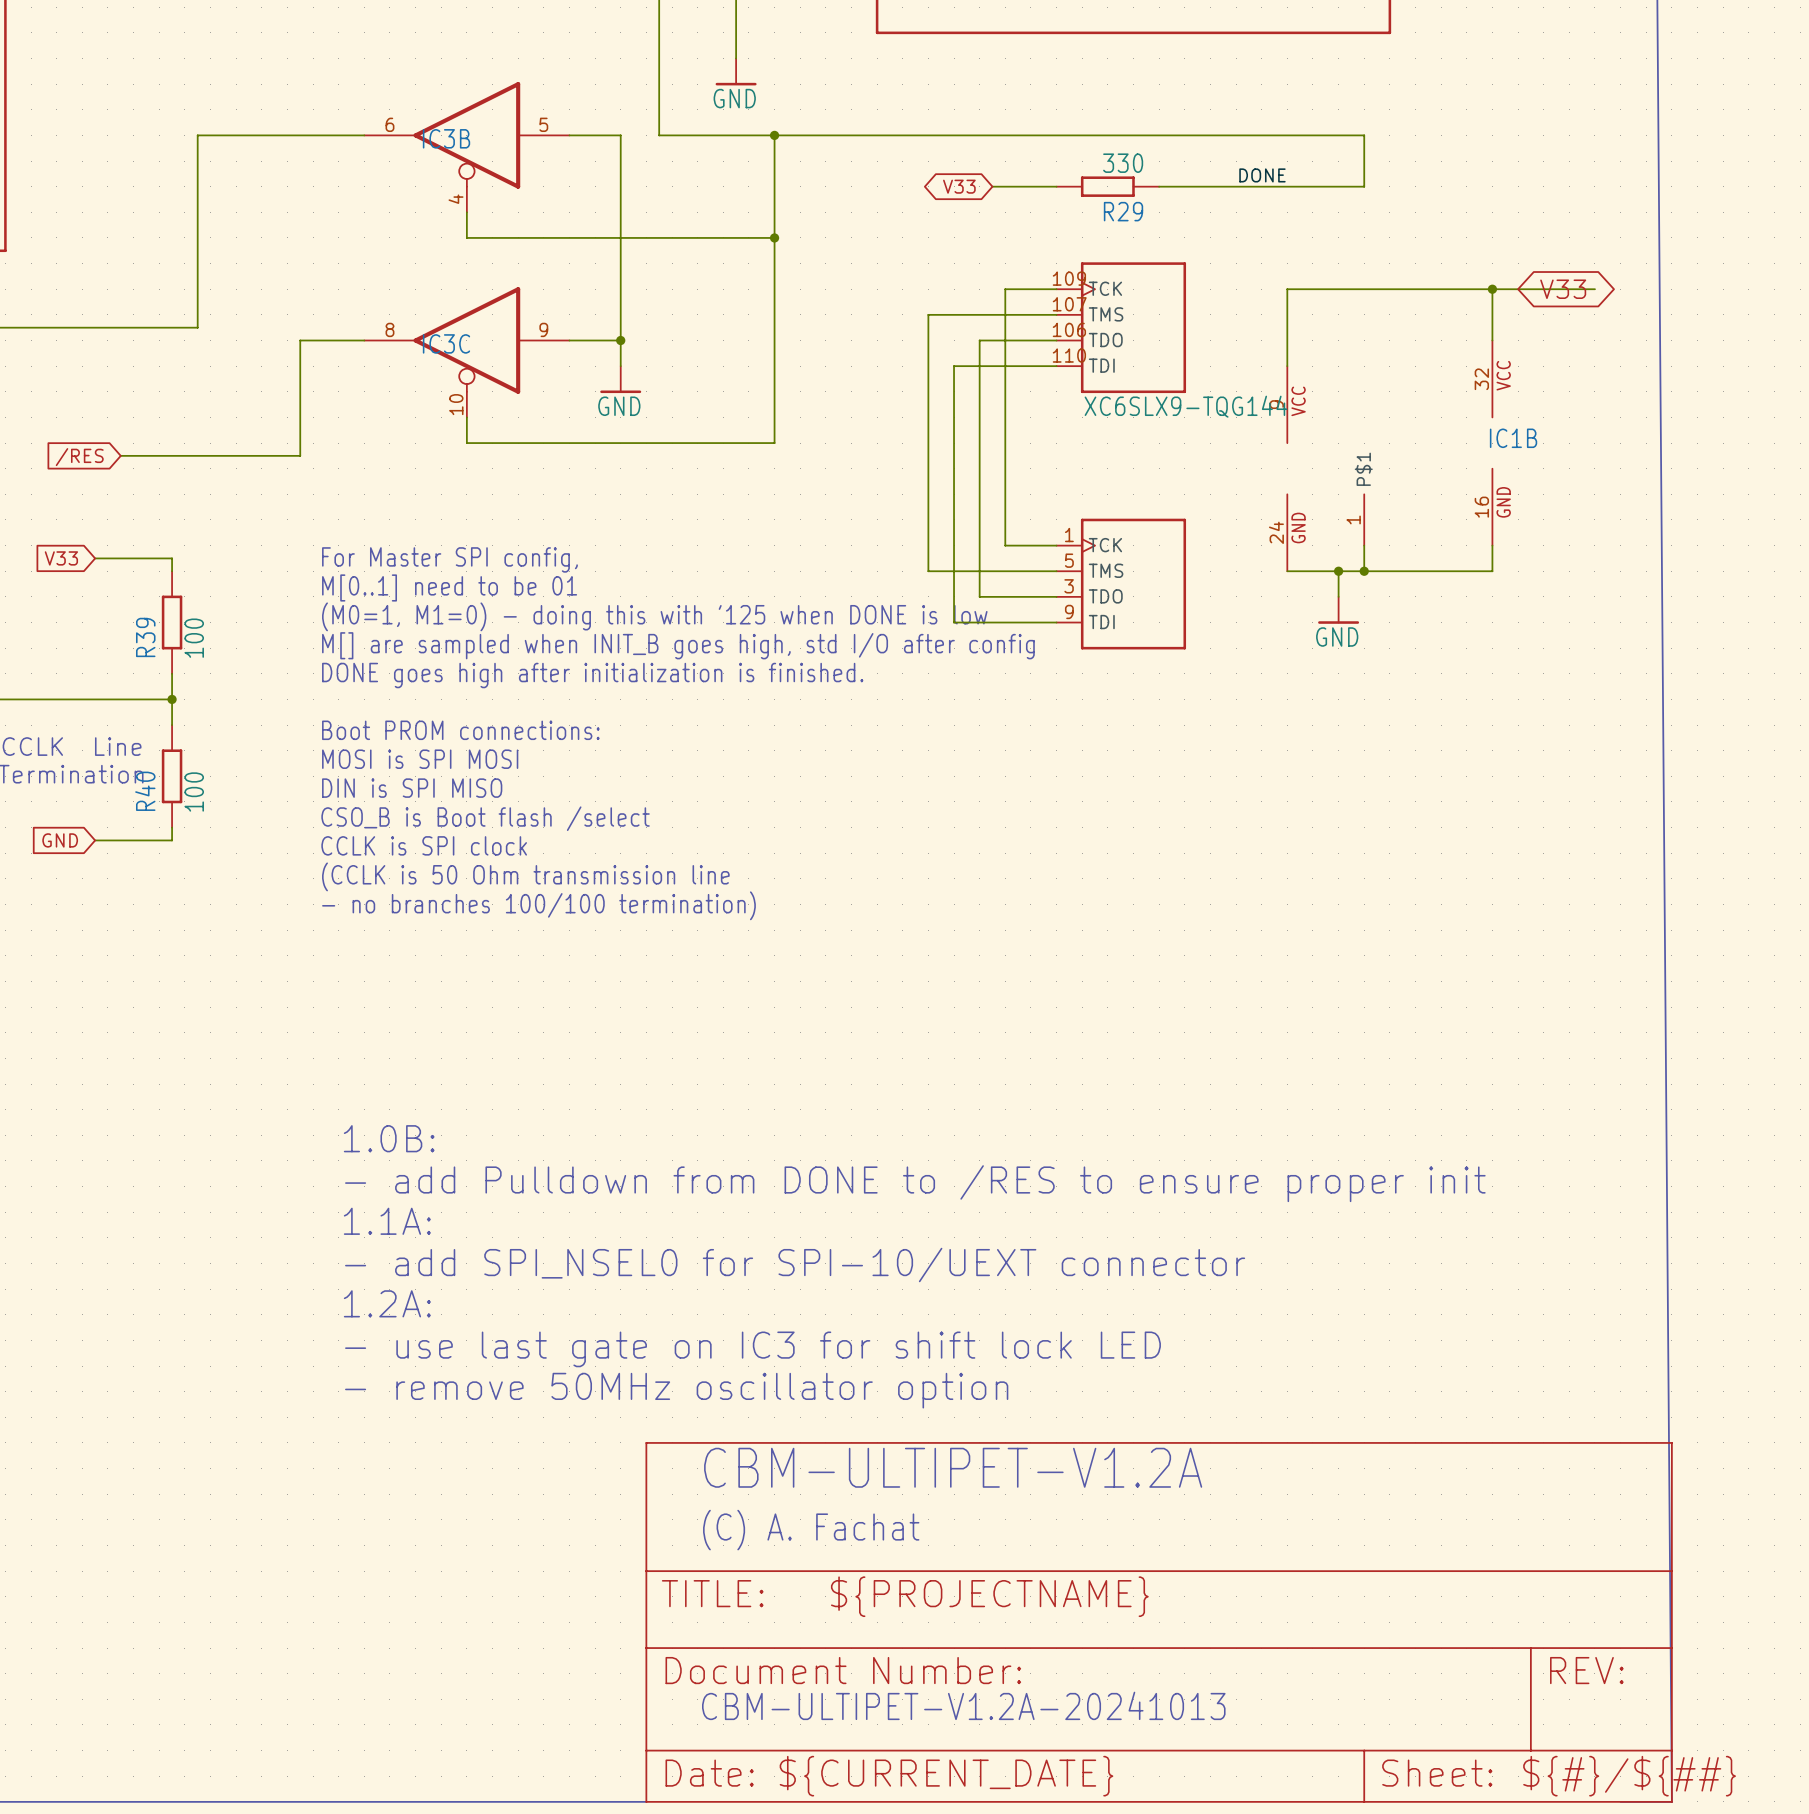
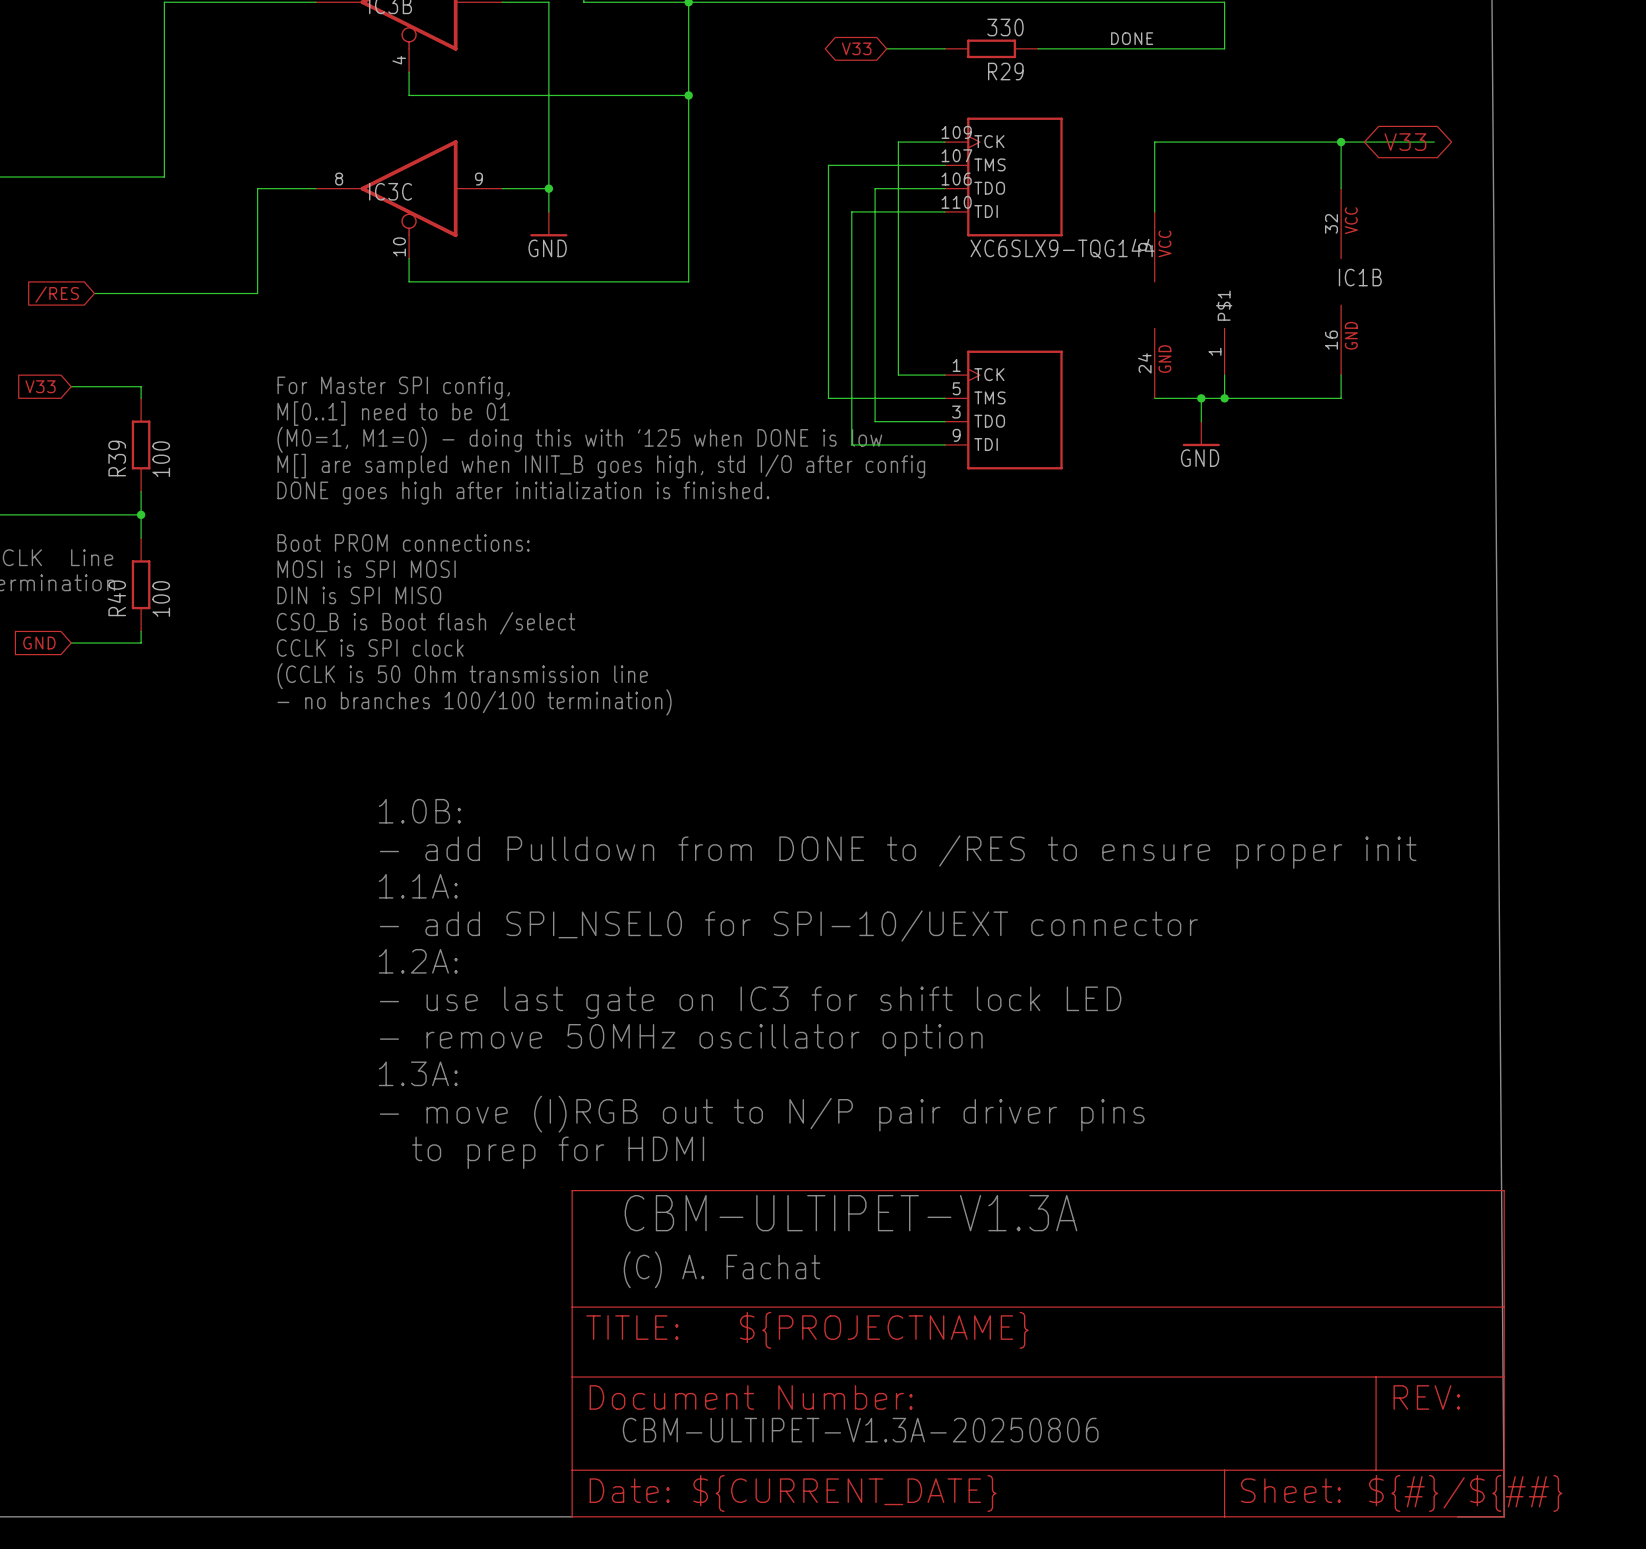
text position: 1.0B: (389, 1138) -> 1.0B: (419, 811)
text position: - add Pulldown from DONE to /RES to ensure proper init (915, 1183) -> - add Pulldown from DONE to /RES to ensure proper init (898, 852)
text position: 1.1A: (387, 1221) -> 1.1A: (418, 886)
text position: - add SPI_NSEL0 for SPI-10/UEXT connector (795, 1265) -> - add SPI_NSEL0 for SPI-10/UEXT connector (788, 926)
text position: 1.2A: (387, 1303) -> 1.2A: (418, 961)
text: none -> 1.3A: (418, 1073)
text position: - use last gate on IC3 for shift lock LED (752, 1349) -> - use last gate on IC3 for shift lock LED (750, 1002)
text: none -> - move (I)RGB out to N/P pair driver pins (762, 1114)
text position: - remove 50MHz oscillator option (676, 1390) -> - remove 50MHz oscillator option (681, 1040)
text: none -> to prep for HDMI (558, 1152)
text: CBM-ULTIPET-V1.2A (953, 1467) -> CBM-ULTIPET-V1.3A (851, 1213)
text: CBM-ULTIPET-V1.2A-20241013 (963, 1705) -> CBM-ULTIPET-V1.3A-20250806 (860, 1430)

